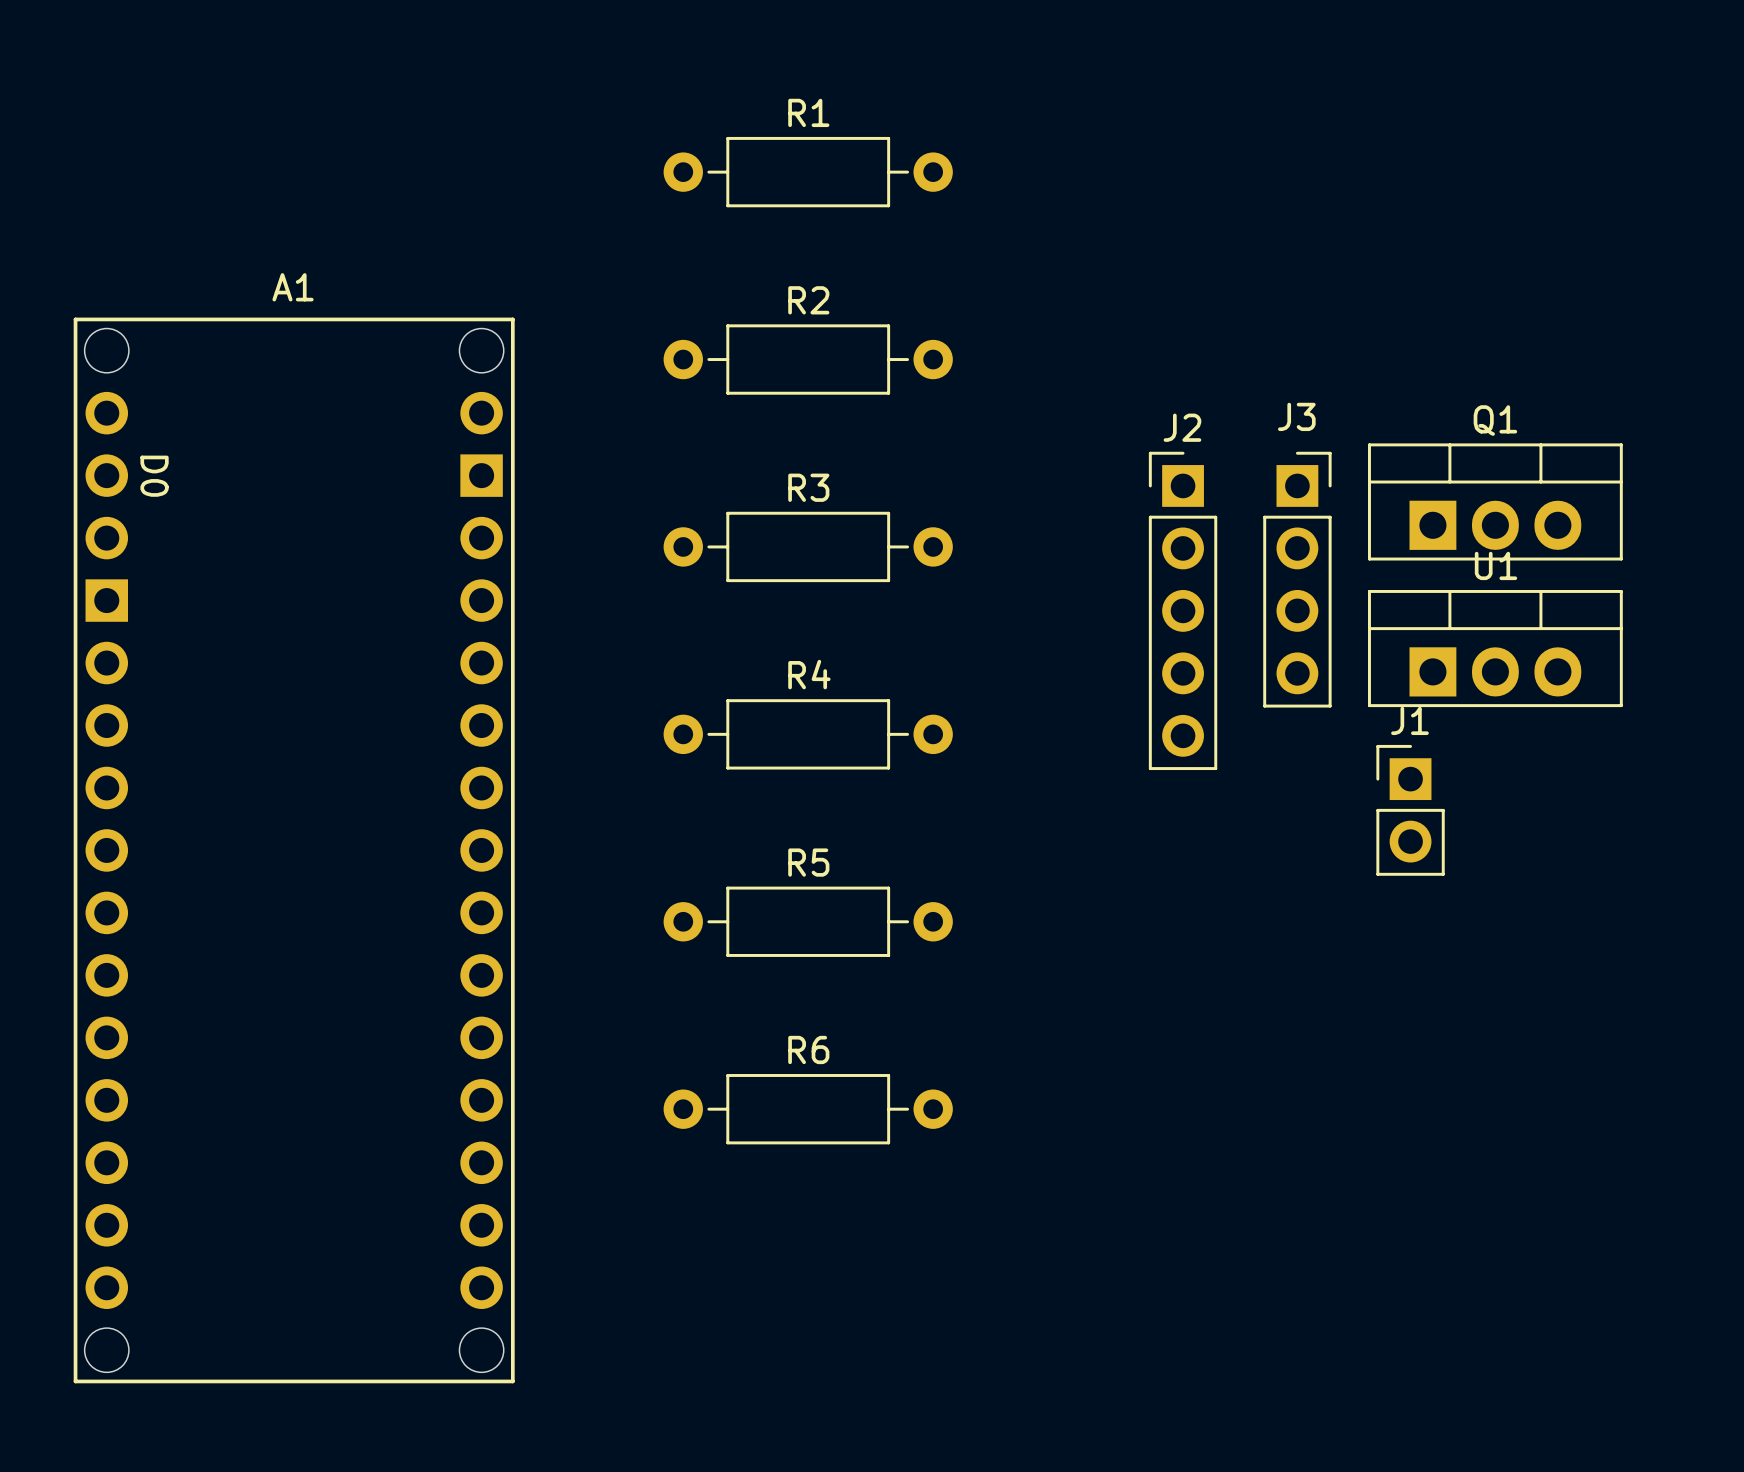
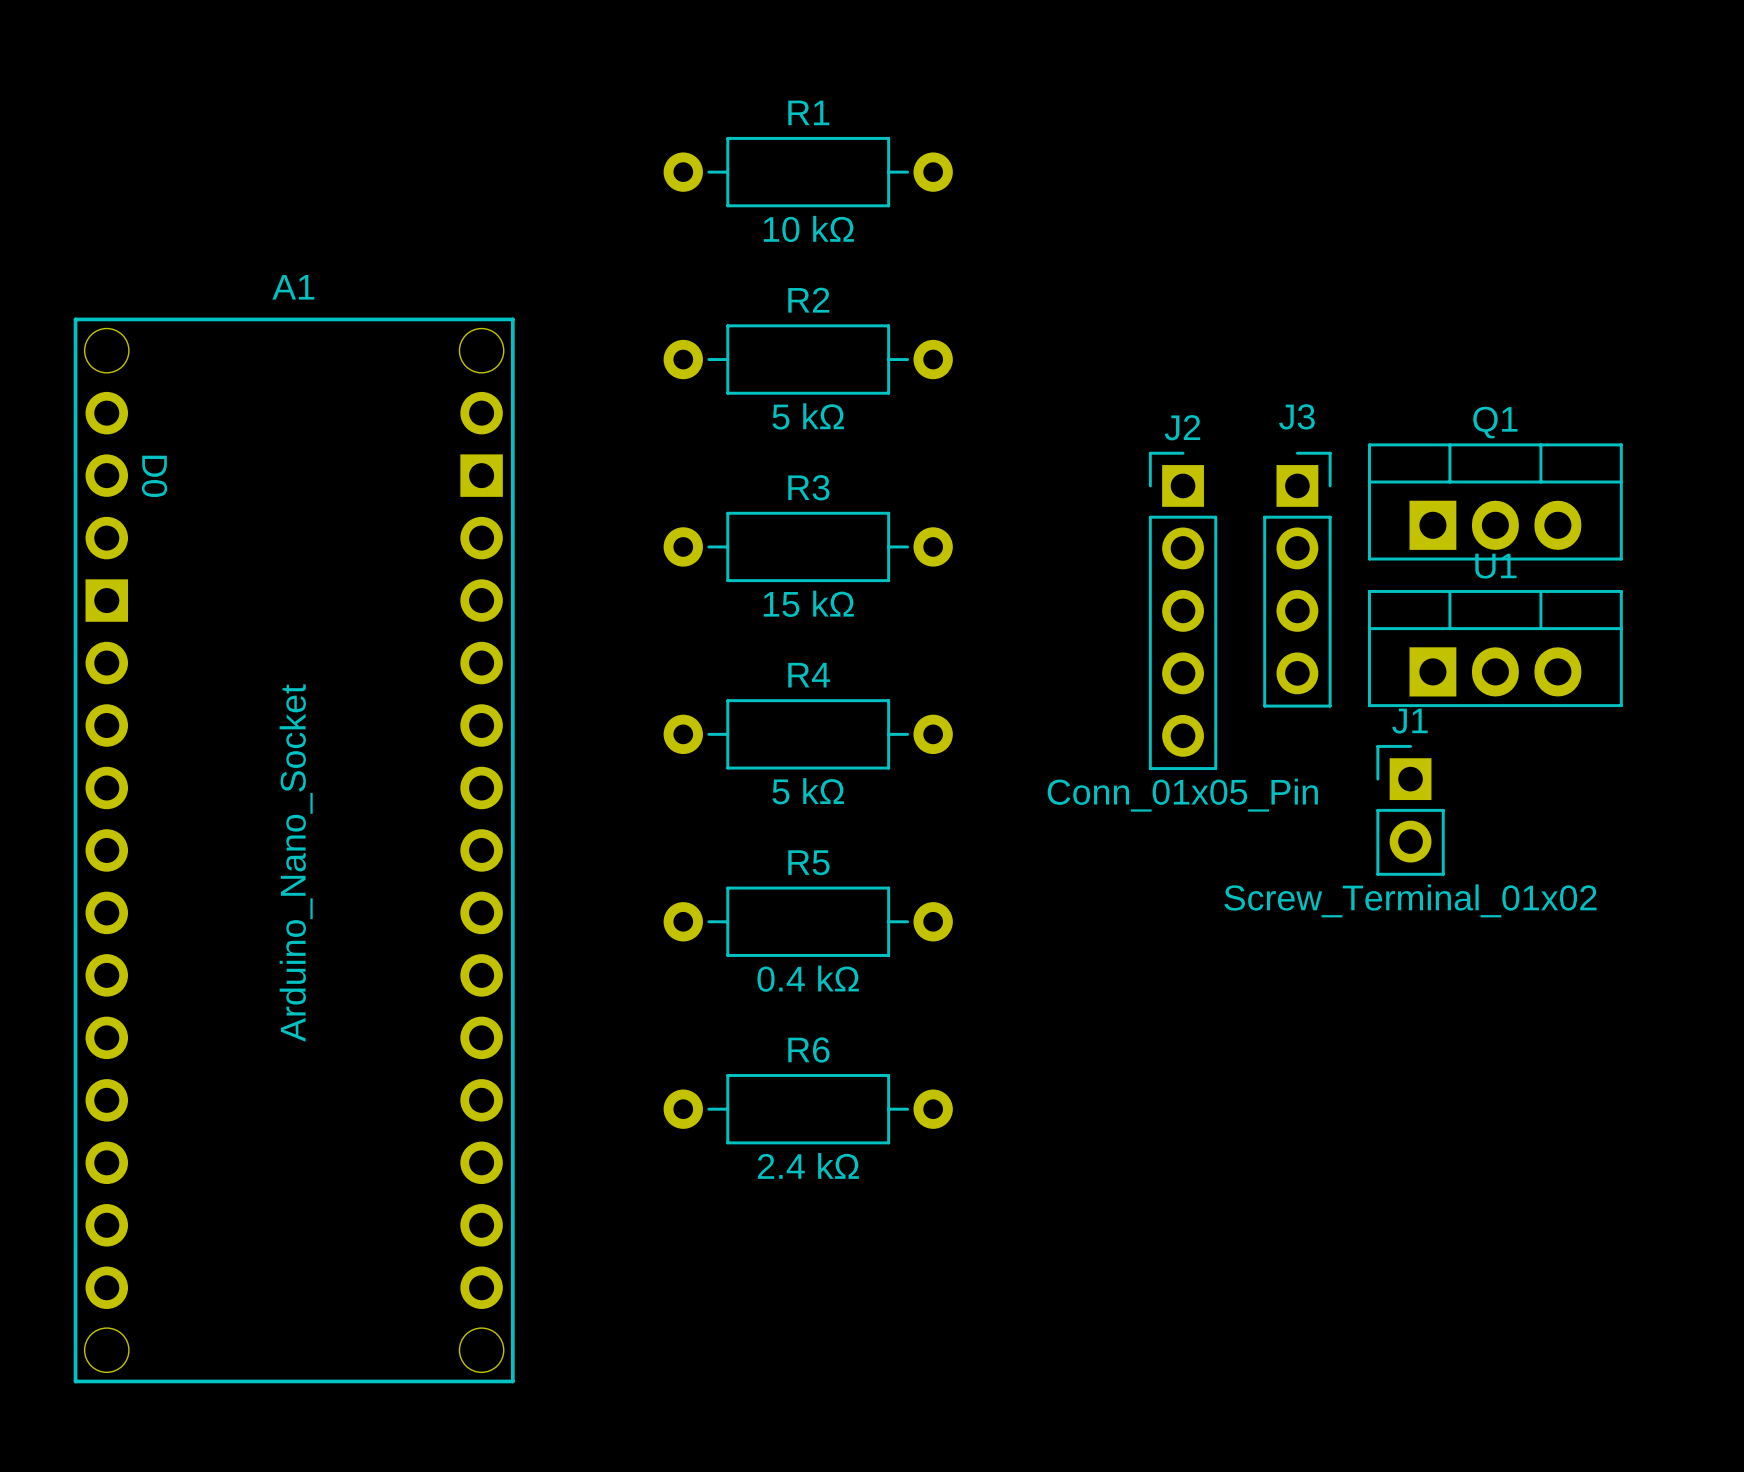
R1 value: none -> 10 kΩ (808, 229)
R2 value: none -> 5 kΩ (808, 416)
R3 value: none -> 15 kΩ (808, 603)
R4 value: none -> 5 kΩ (808, 791)
J2 value: none -> Conn_01x05_Pin (1182, 795)
A1 value: none -> Arduino_Nano_Socket (296, 863)
J1 value: none -> Screw_Terminal_01x02 (1410, 900)
R5 value: none -> 0.4 kΩ (808, 978)
R6 value: none -> 2.4 kΩ (808, 1165)

